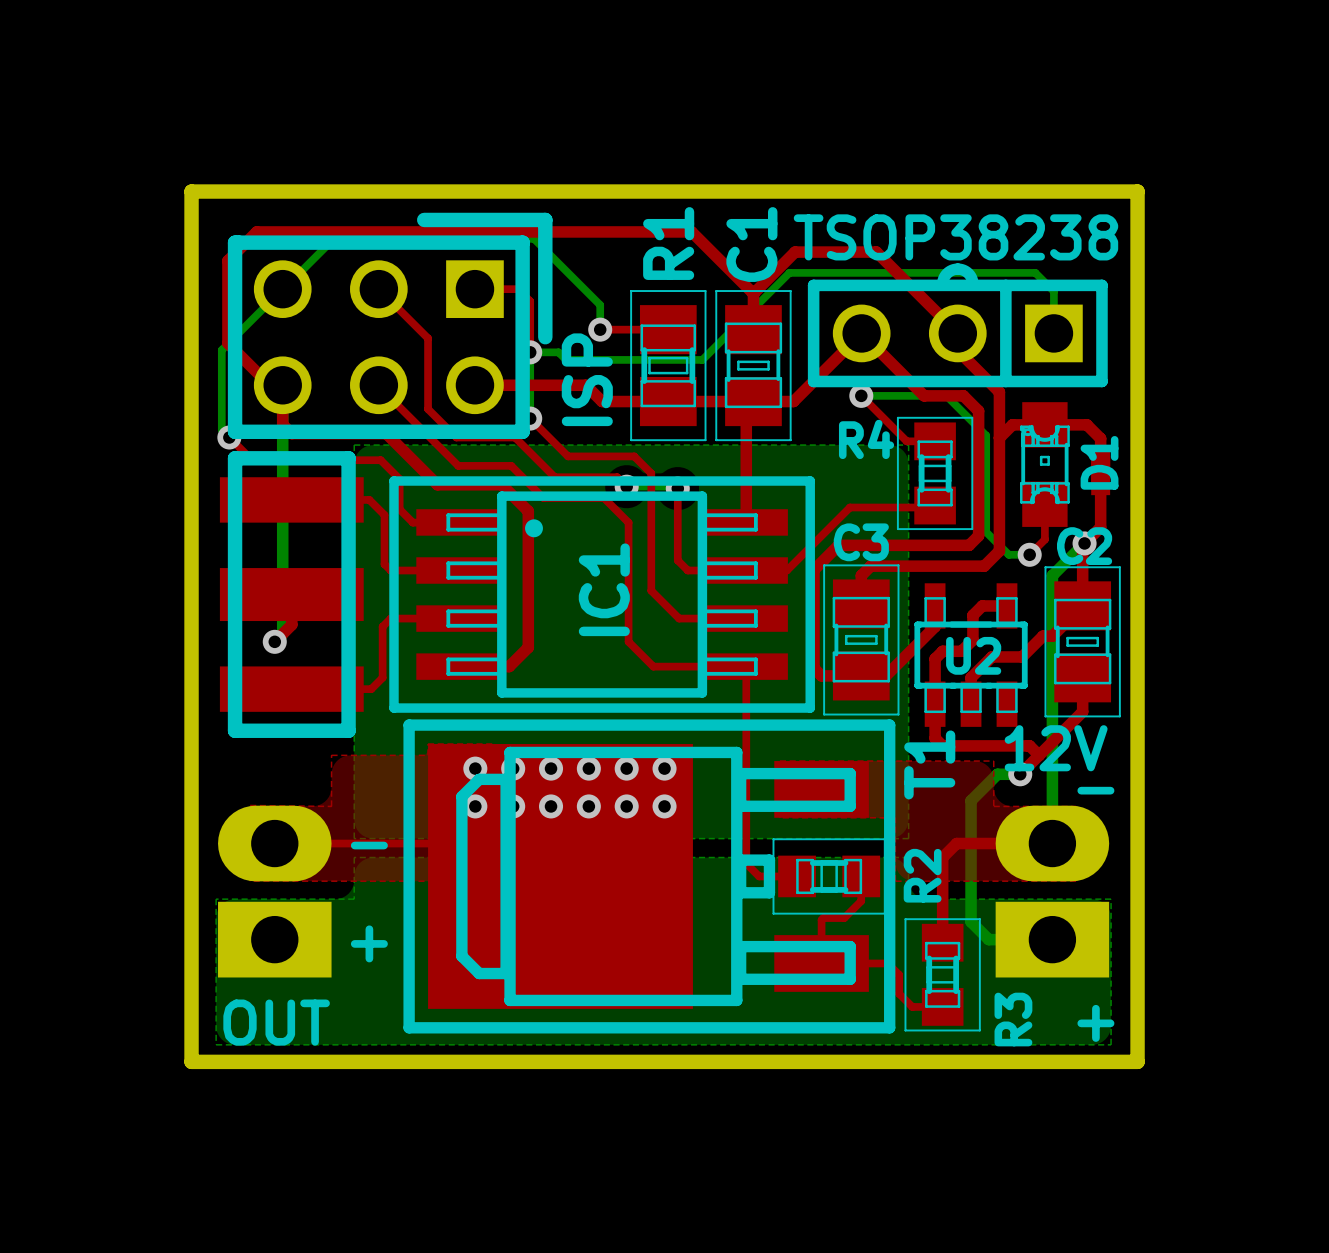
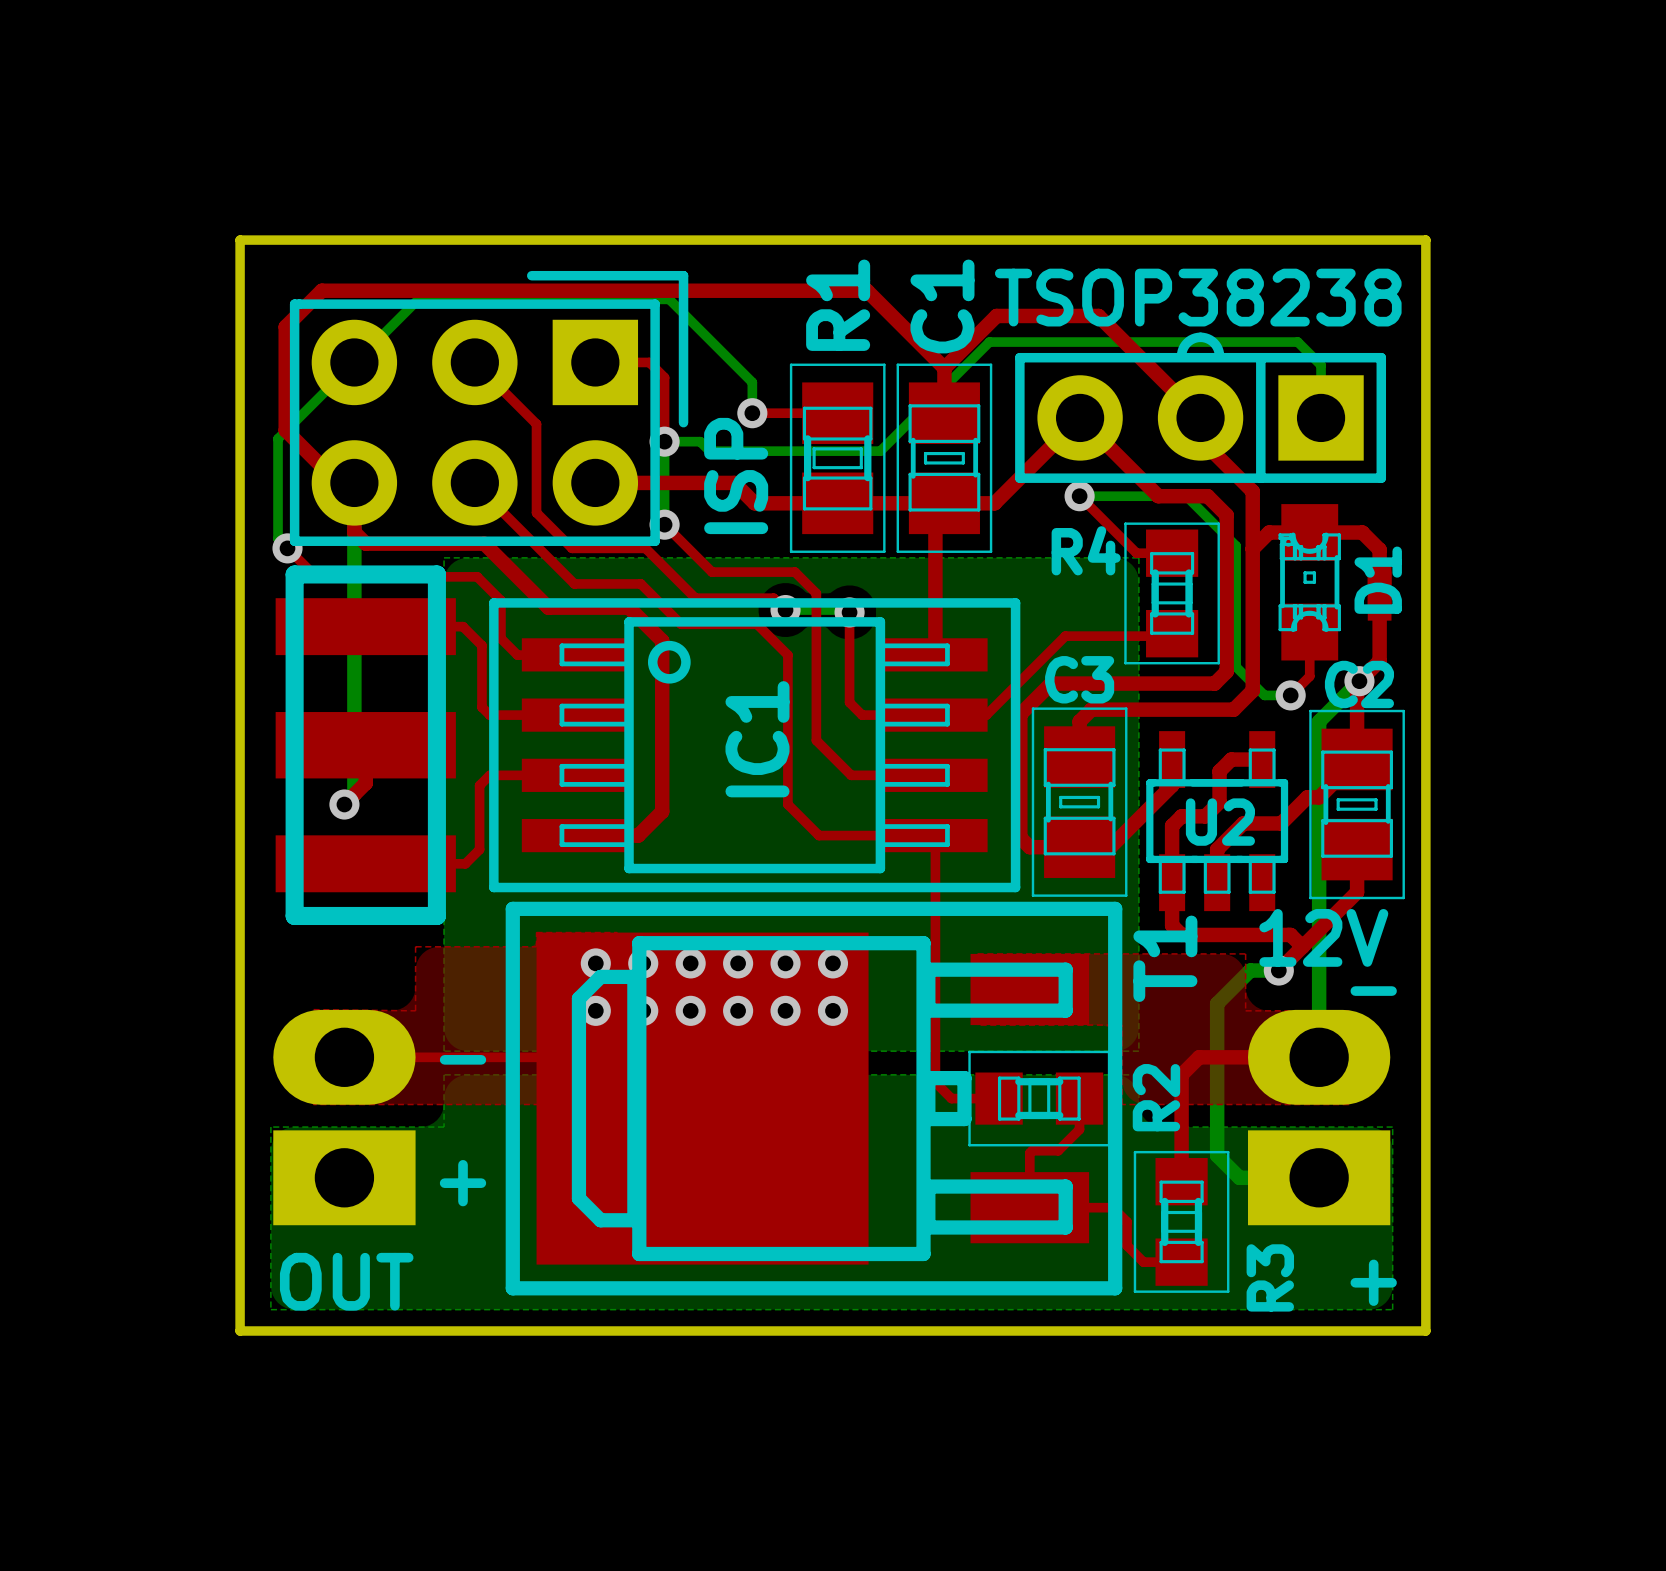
board edge width: thick (191, 191) (191, 1061) (1137, 1061) (1137, 191) (191, 191) -> thin (240, 240) (240, 1331) (1425, 1331) (1425, 240) (240, 240)
part footprint: [227, 212, 553, 440] -> [289, 270, 689, 546]
part footprint: [807, 263, 1108, 388] -> [1015, 332, 1387, 483]
IC1 footprint: [389, 476, 815, 713] -> [489, 598, 1021, 893]

